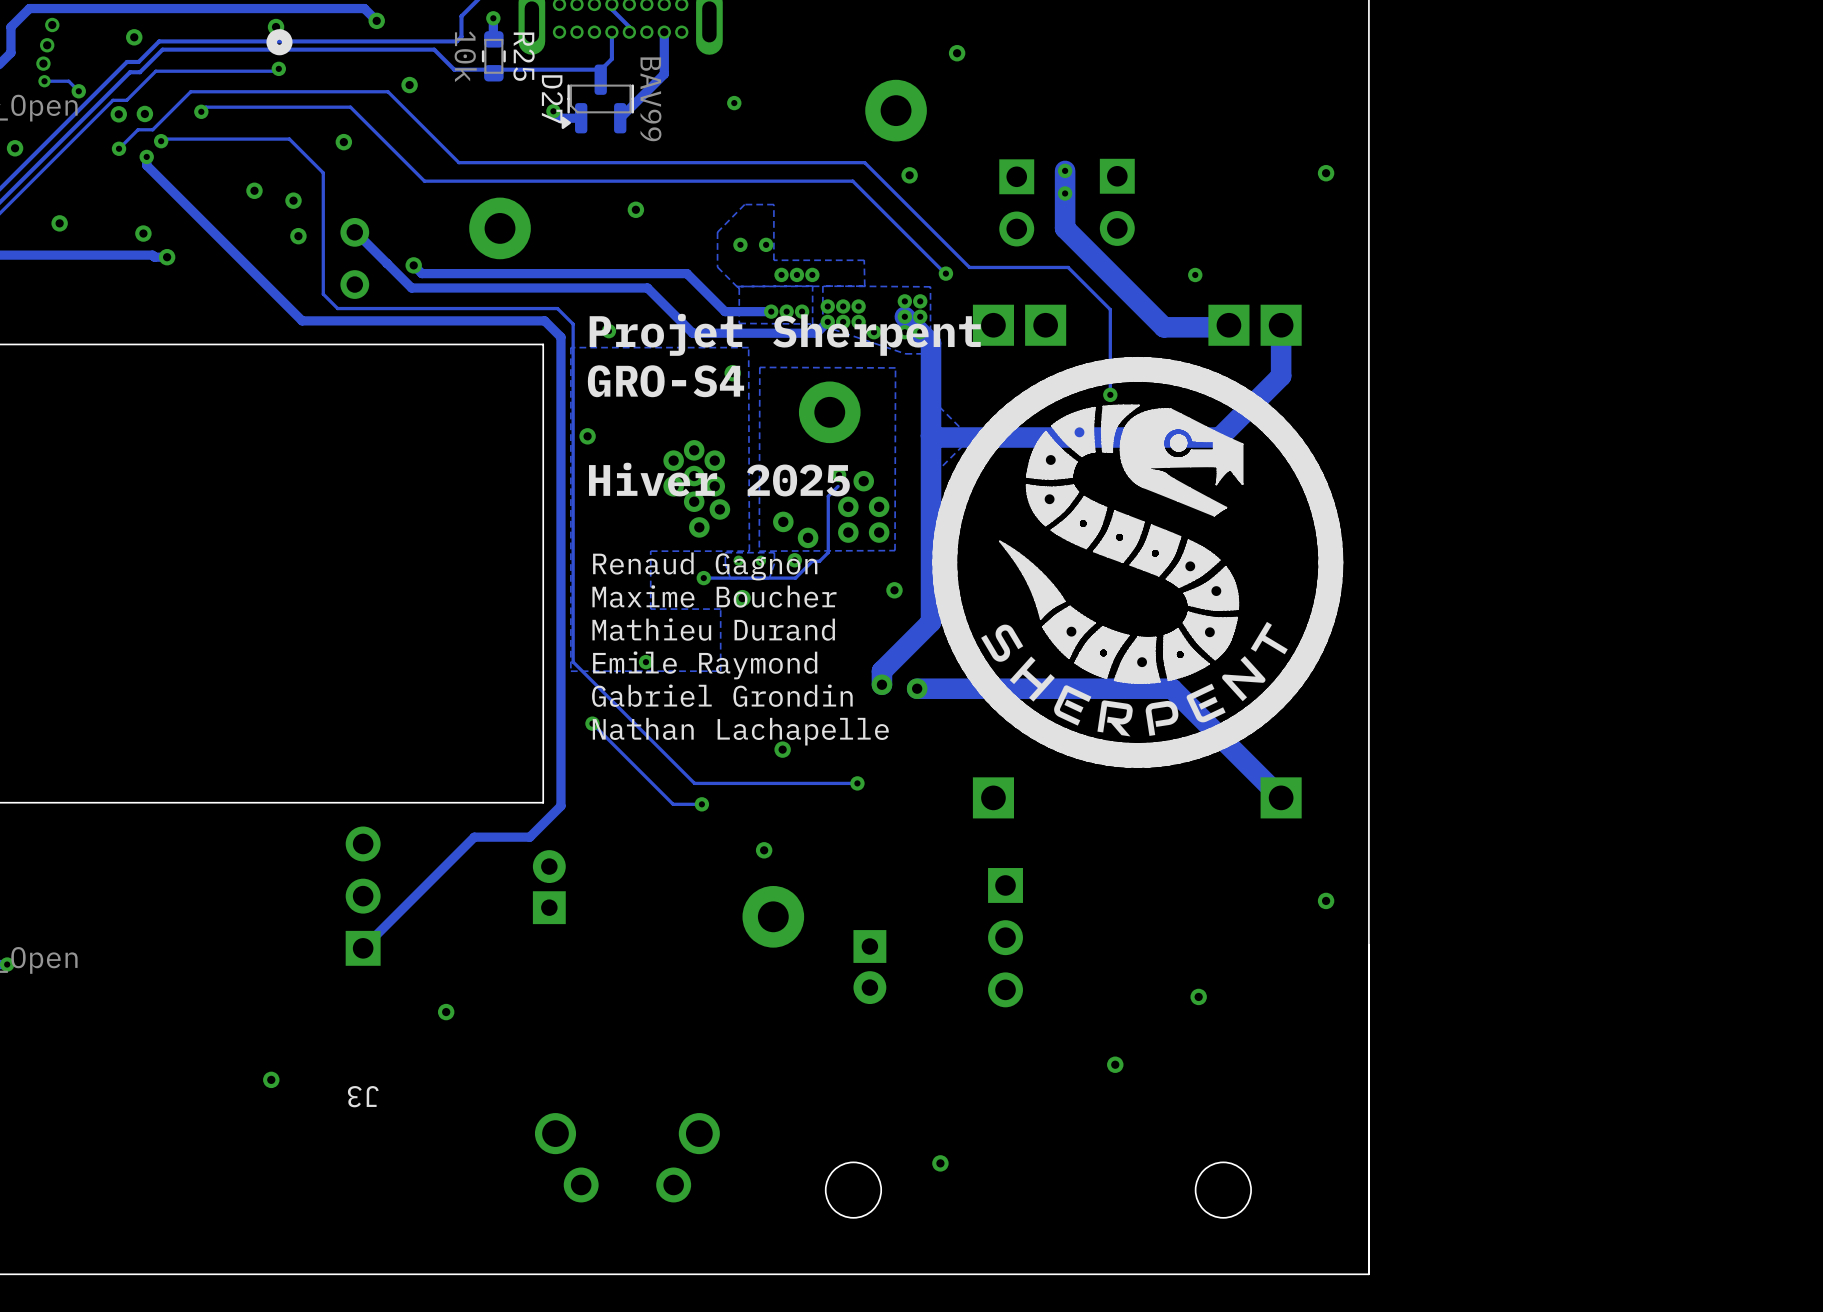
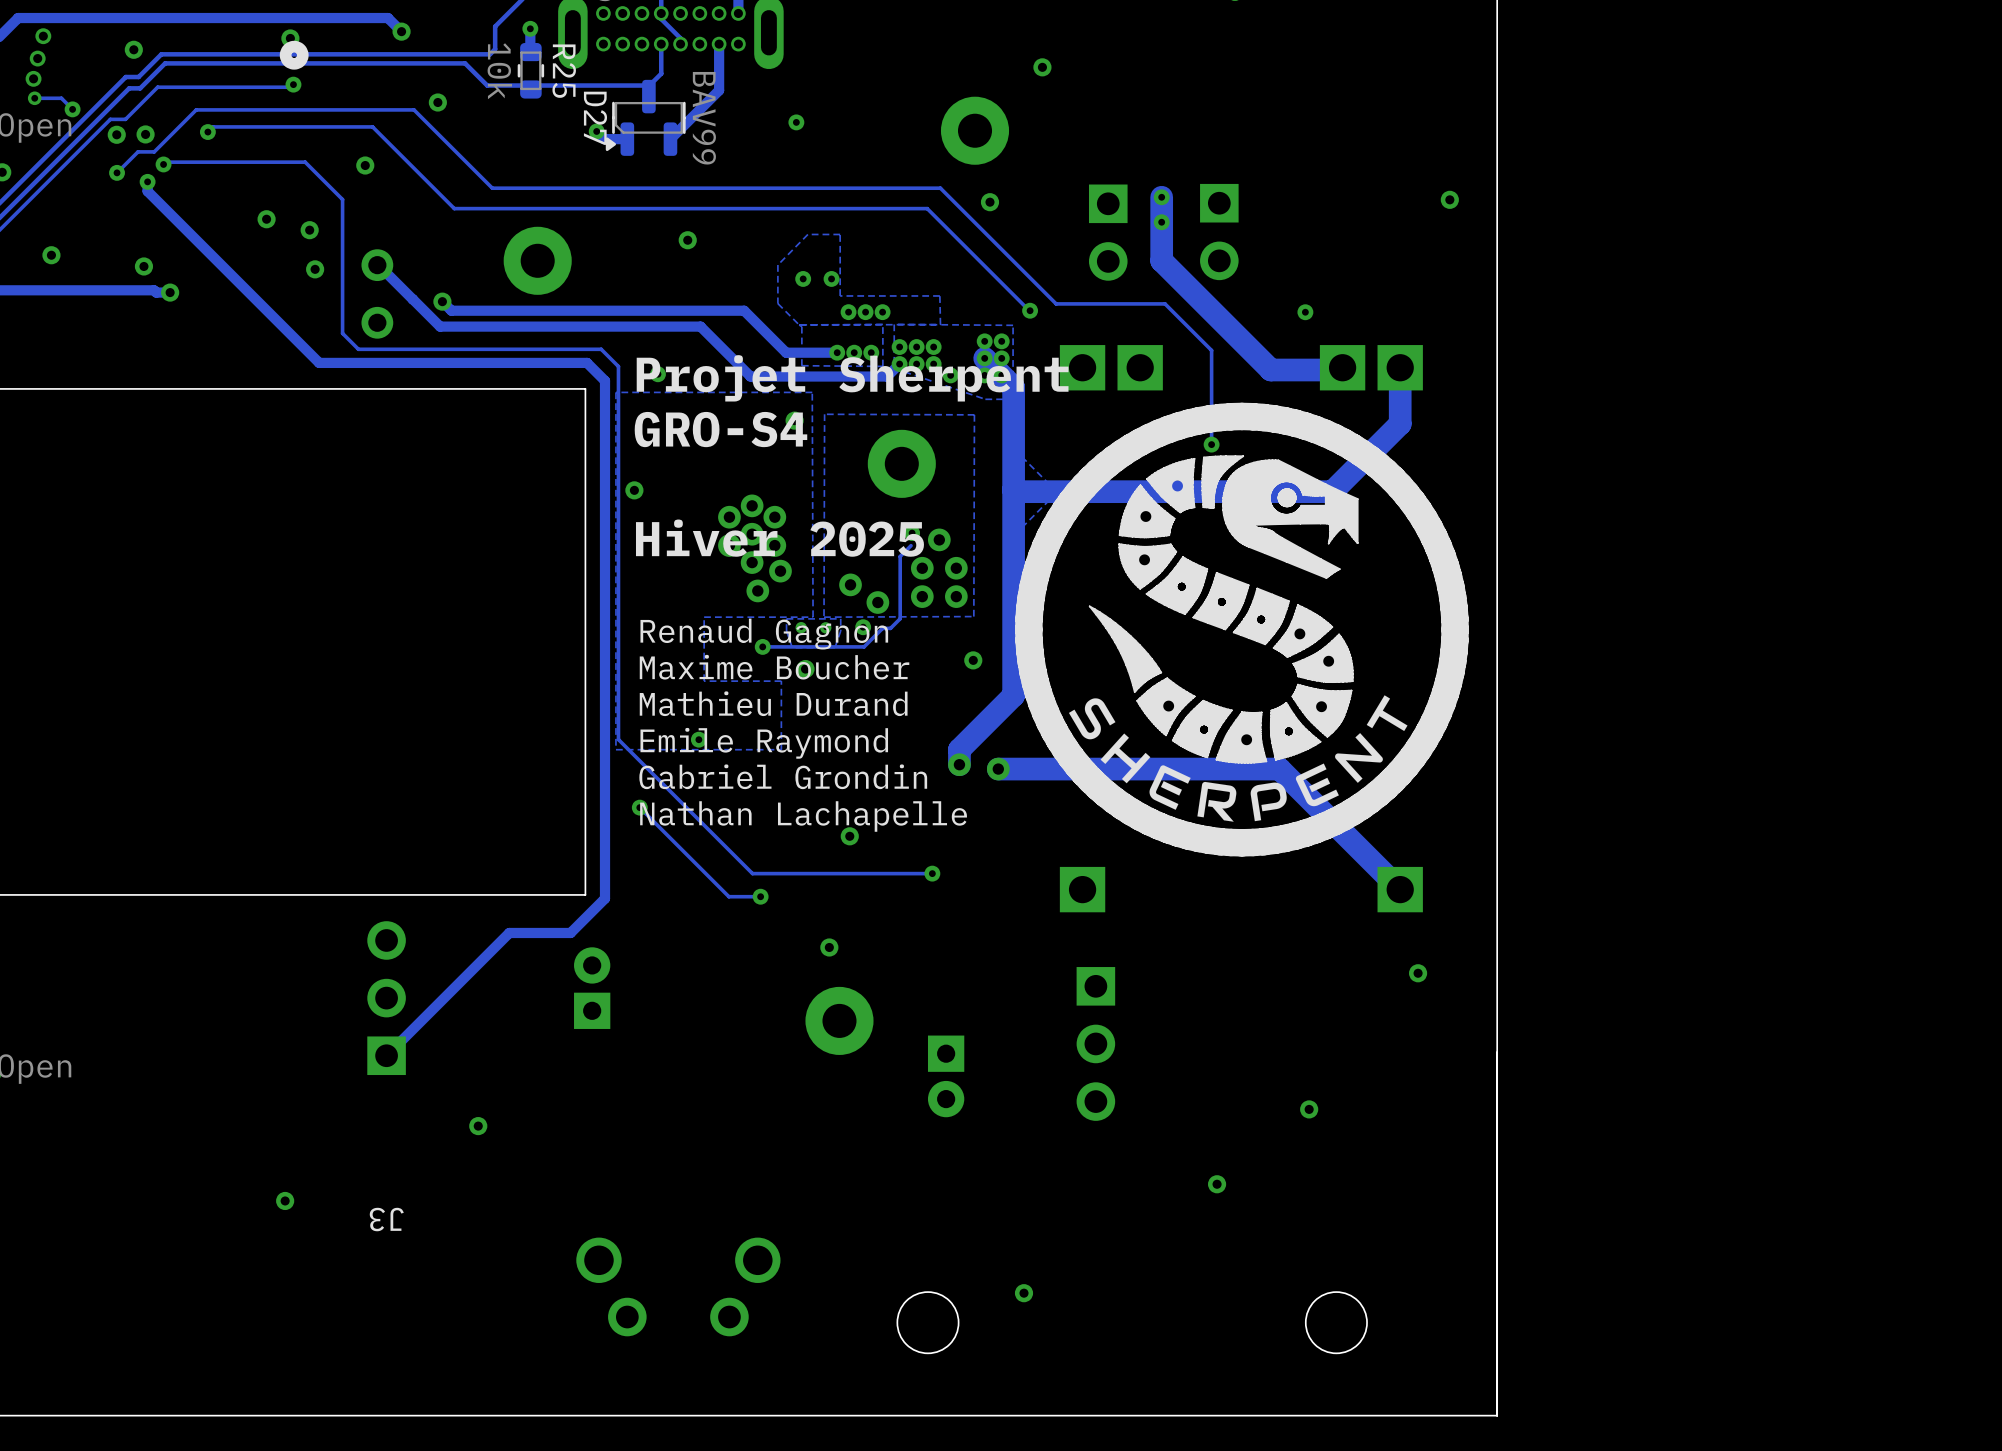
via position: (1326, 900) -> (1418, 973)

